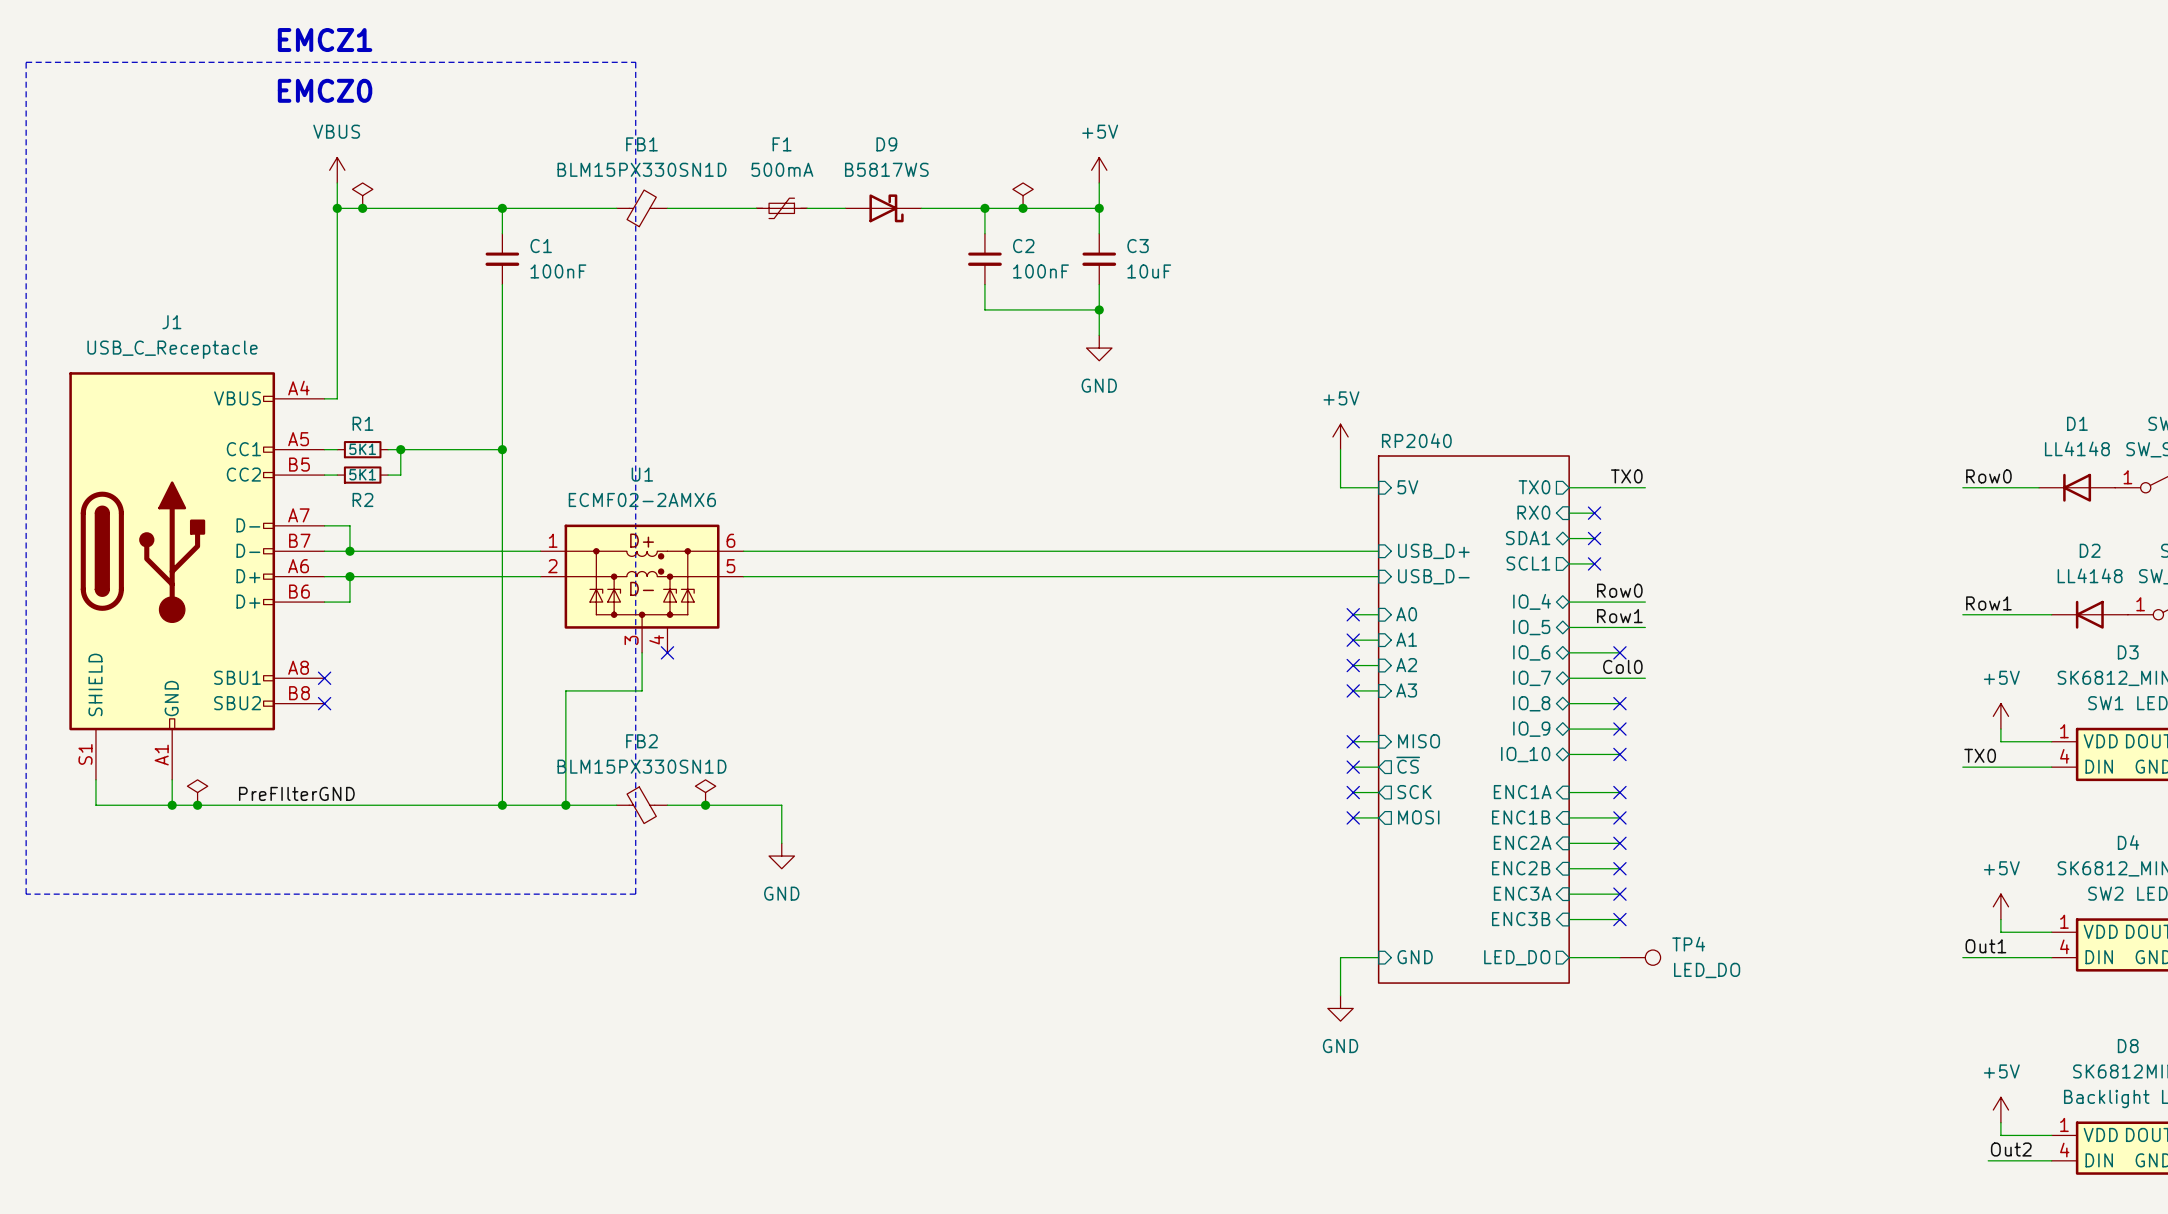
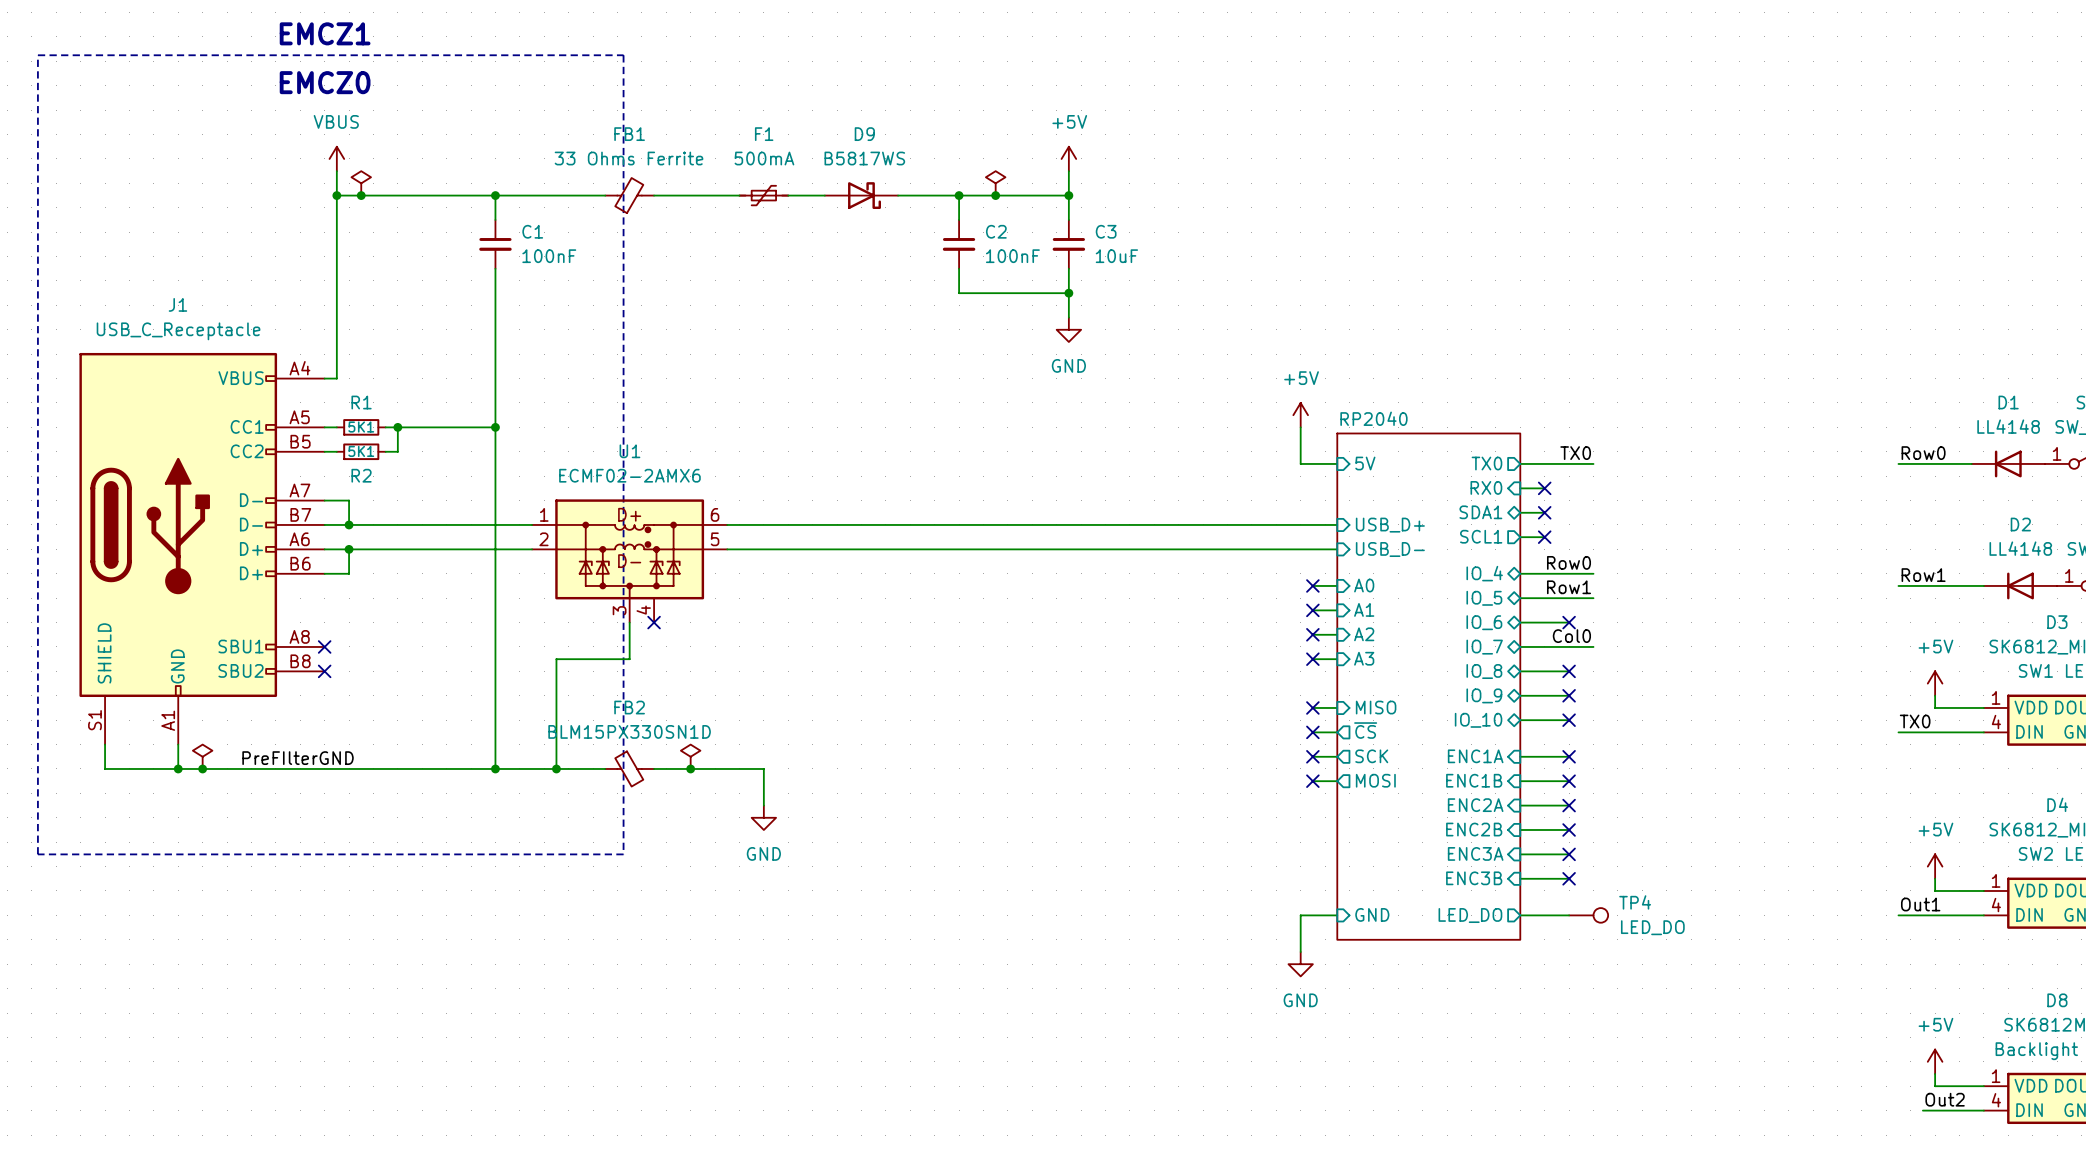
FB1 value: BLM15PX330SN1D (641, 169) -> 33 Ohms Ferrite (629, 158)

